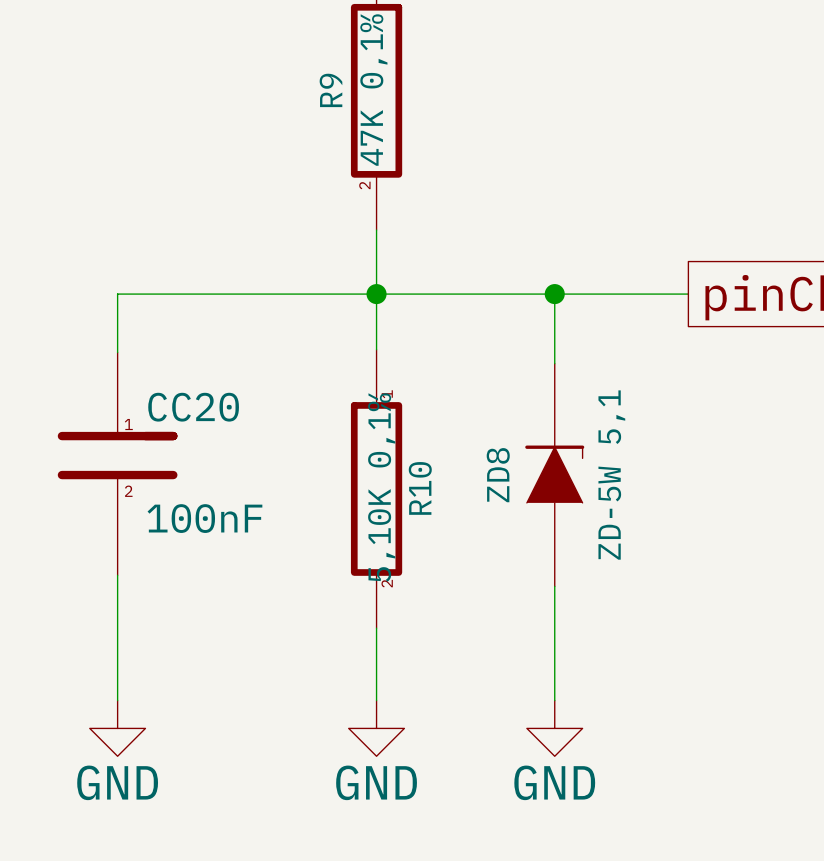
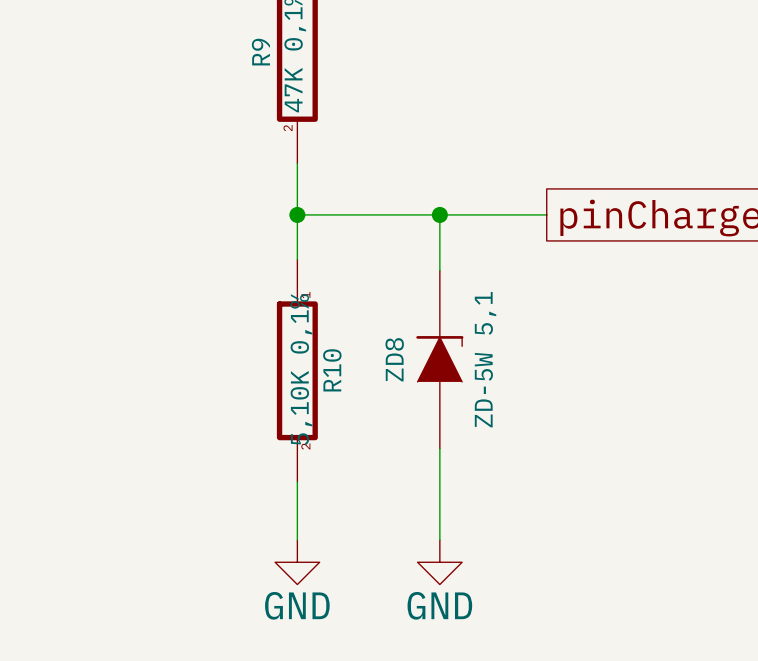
wire: (376, 294) (117, 294) (117, 352) -> none
CC20: 100nF (117, 463) -> none
wire: (117, 575) (117, 700) -> none
power symbol: GND (117, 728) -> none

